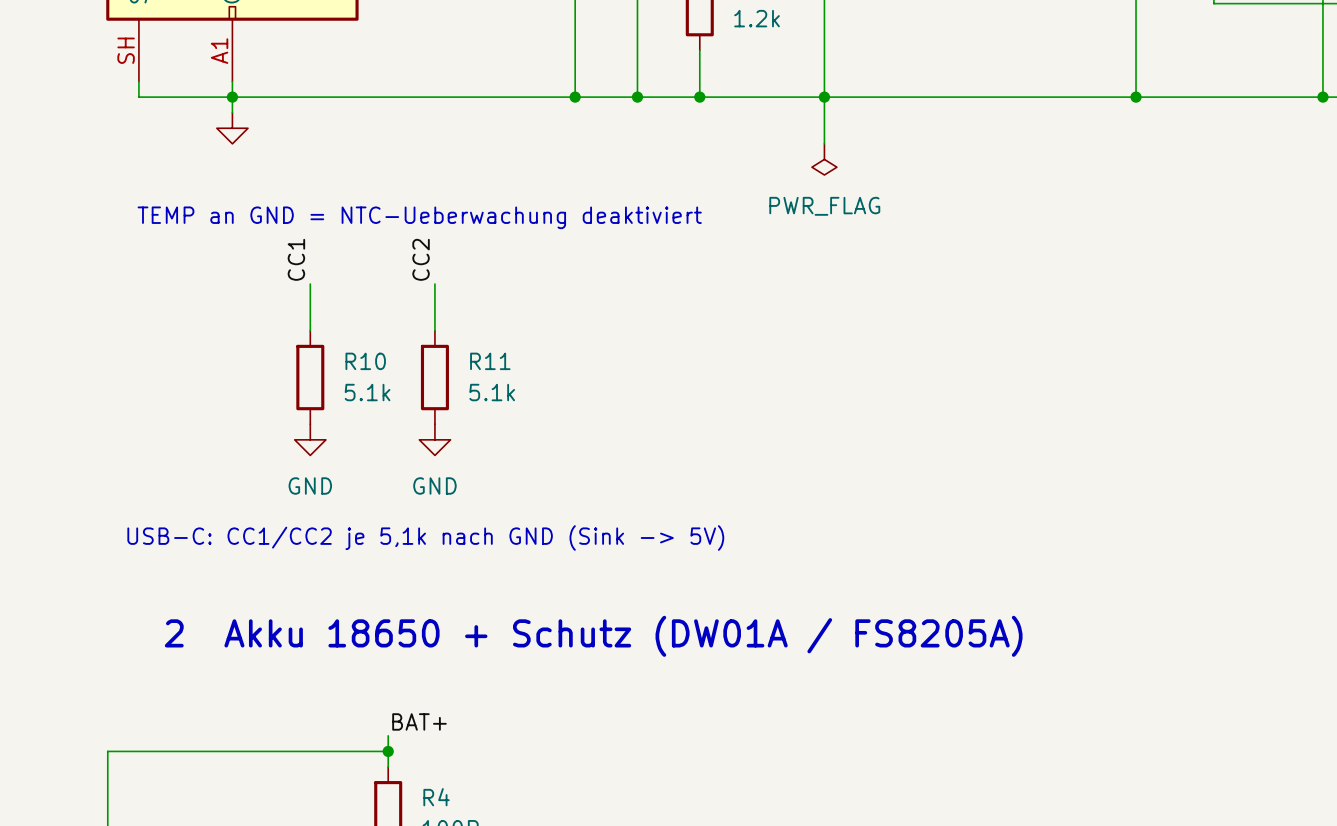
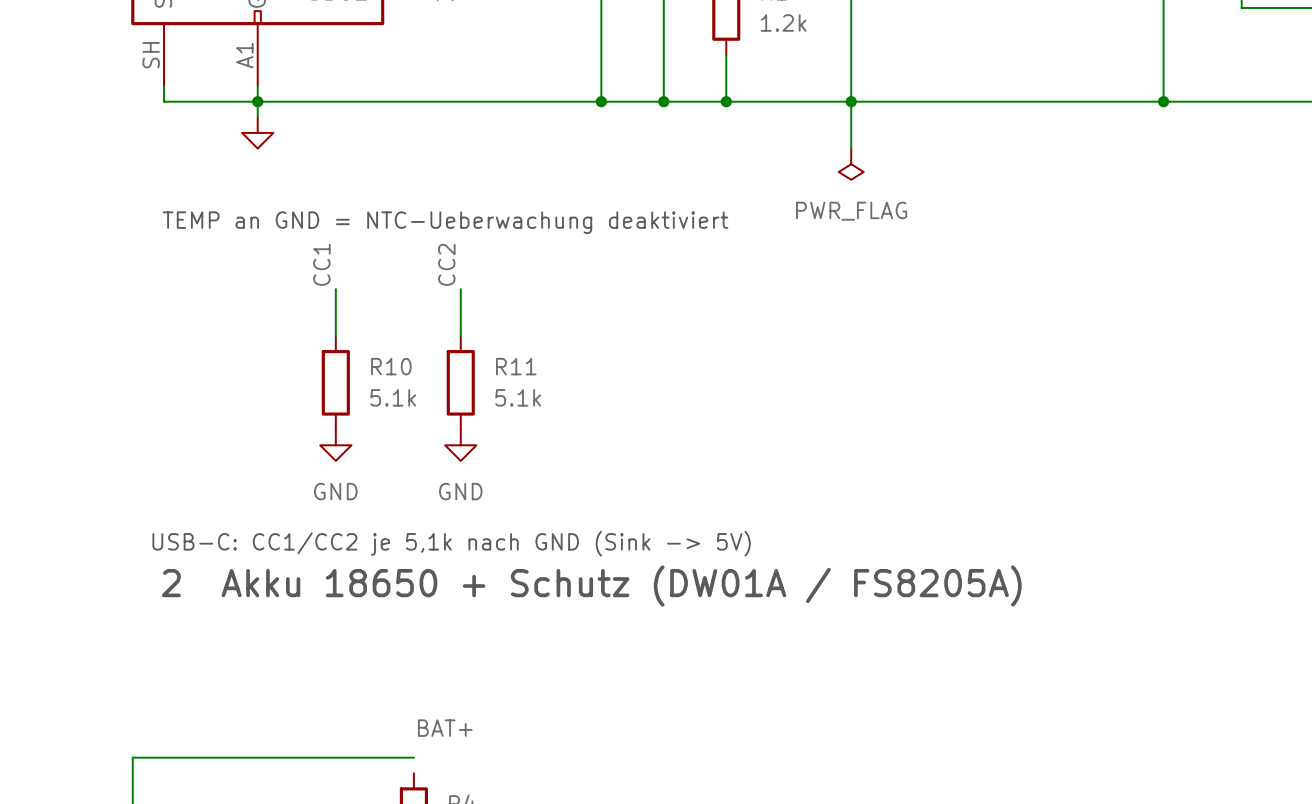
text position: 2 Akku 18650 + Schutz (DW01A / FS8205A) (593, 636) -> 2 Akku 18650 + Schutz (DW01A / FS8205A) (591, 586)
wire: (388, 735) (388, 767) -> none
junction: (388, 751) -> none

